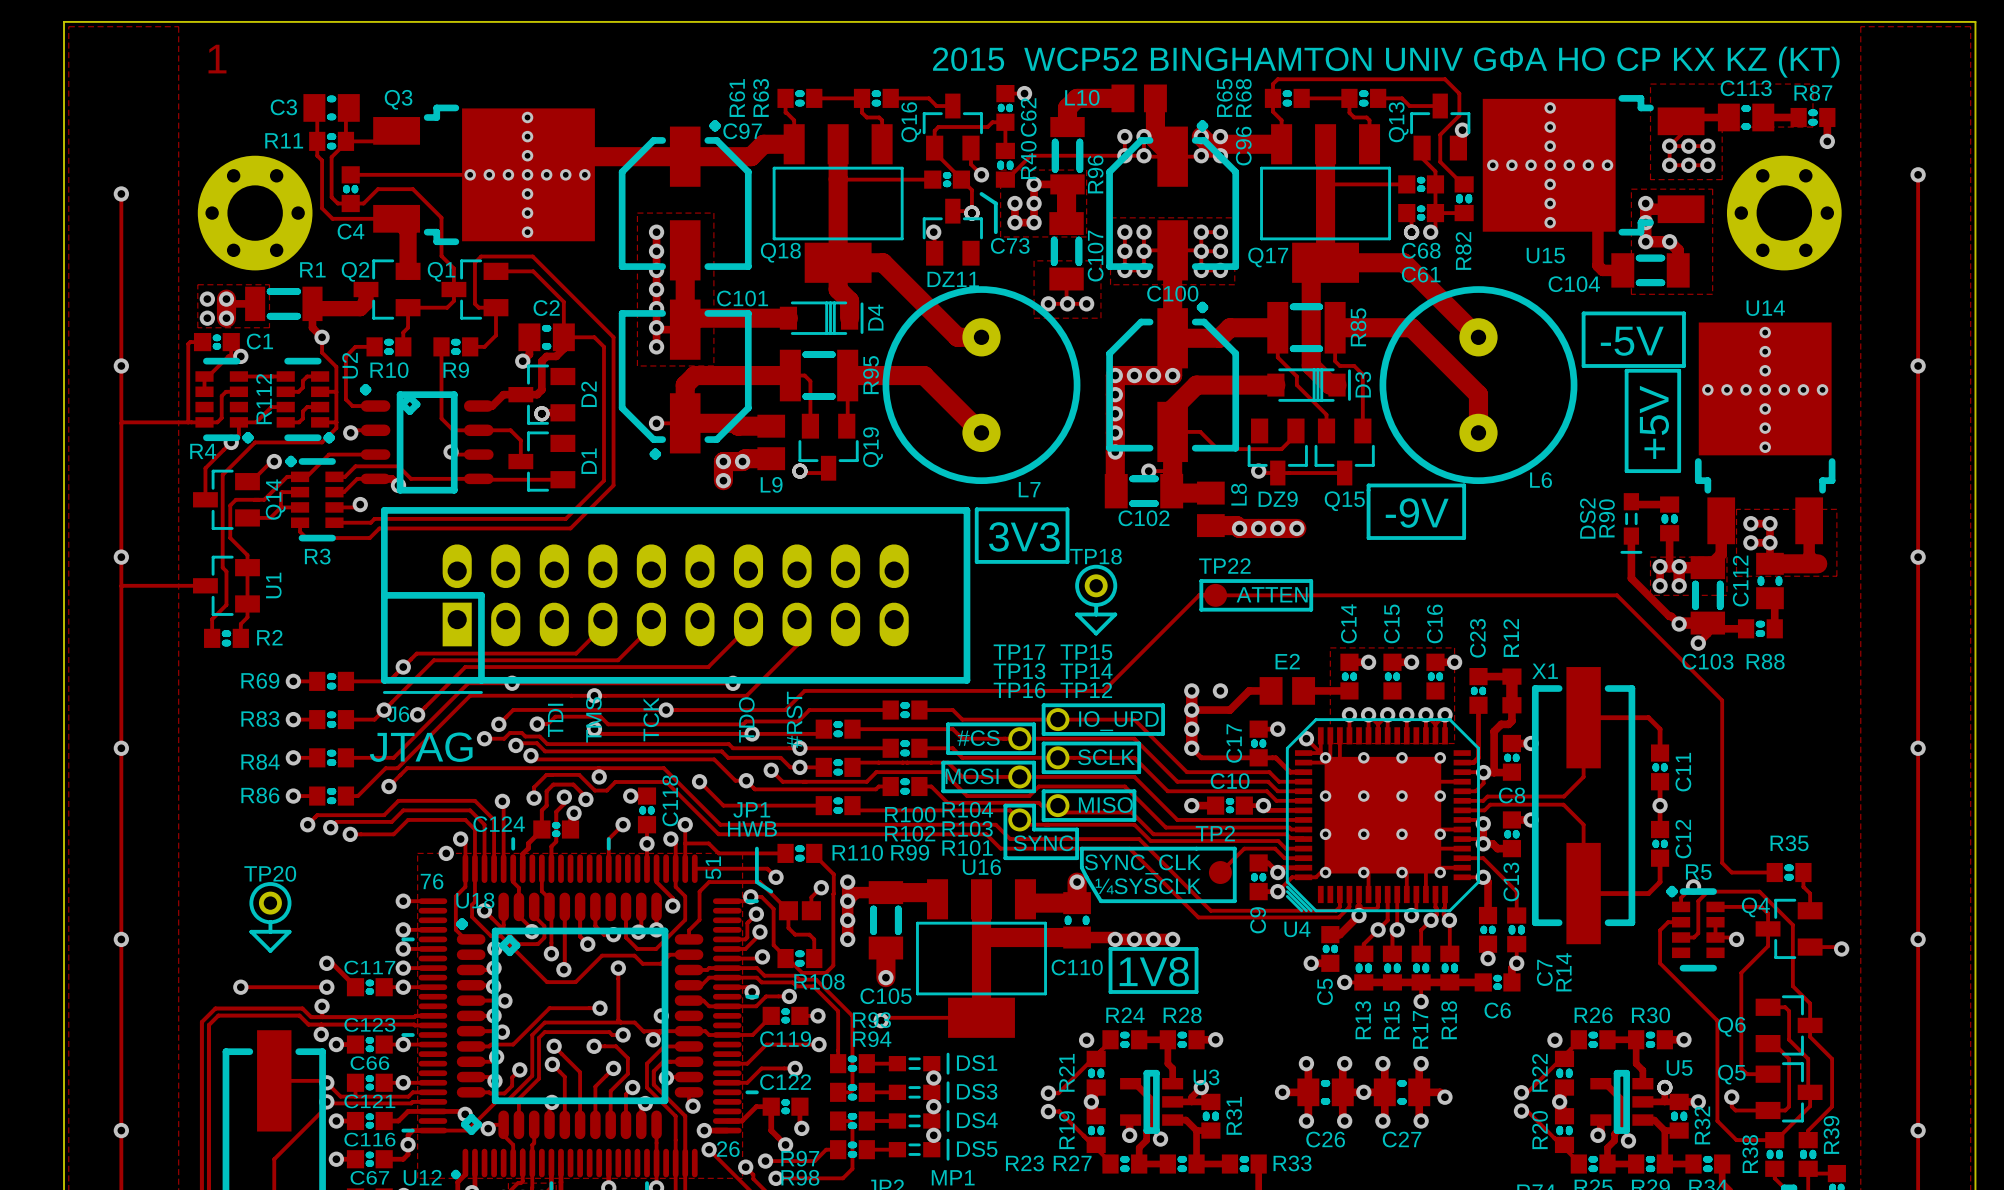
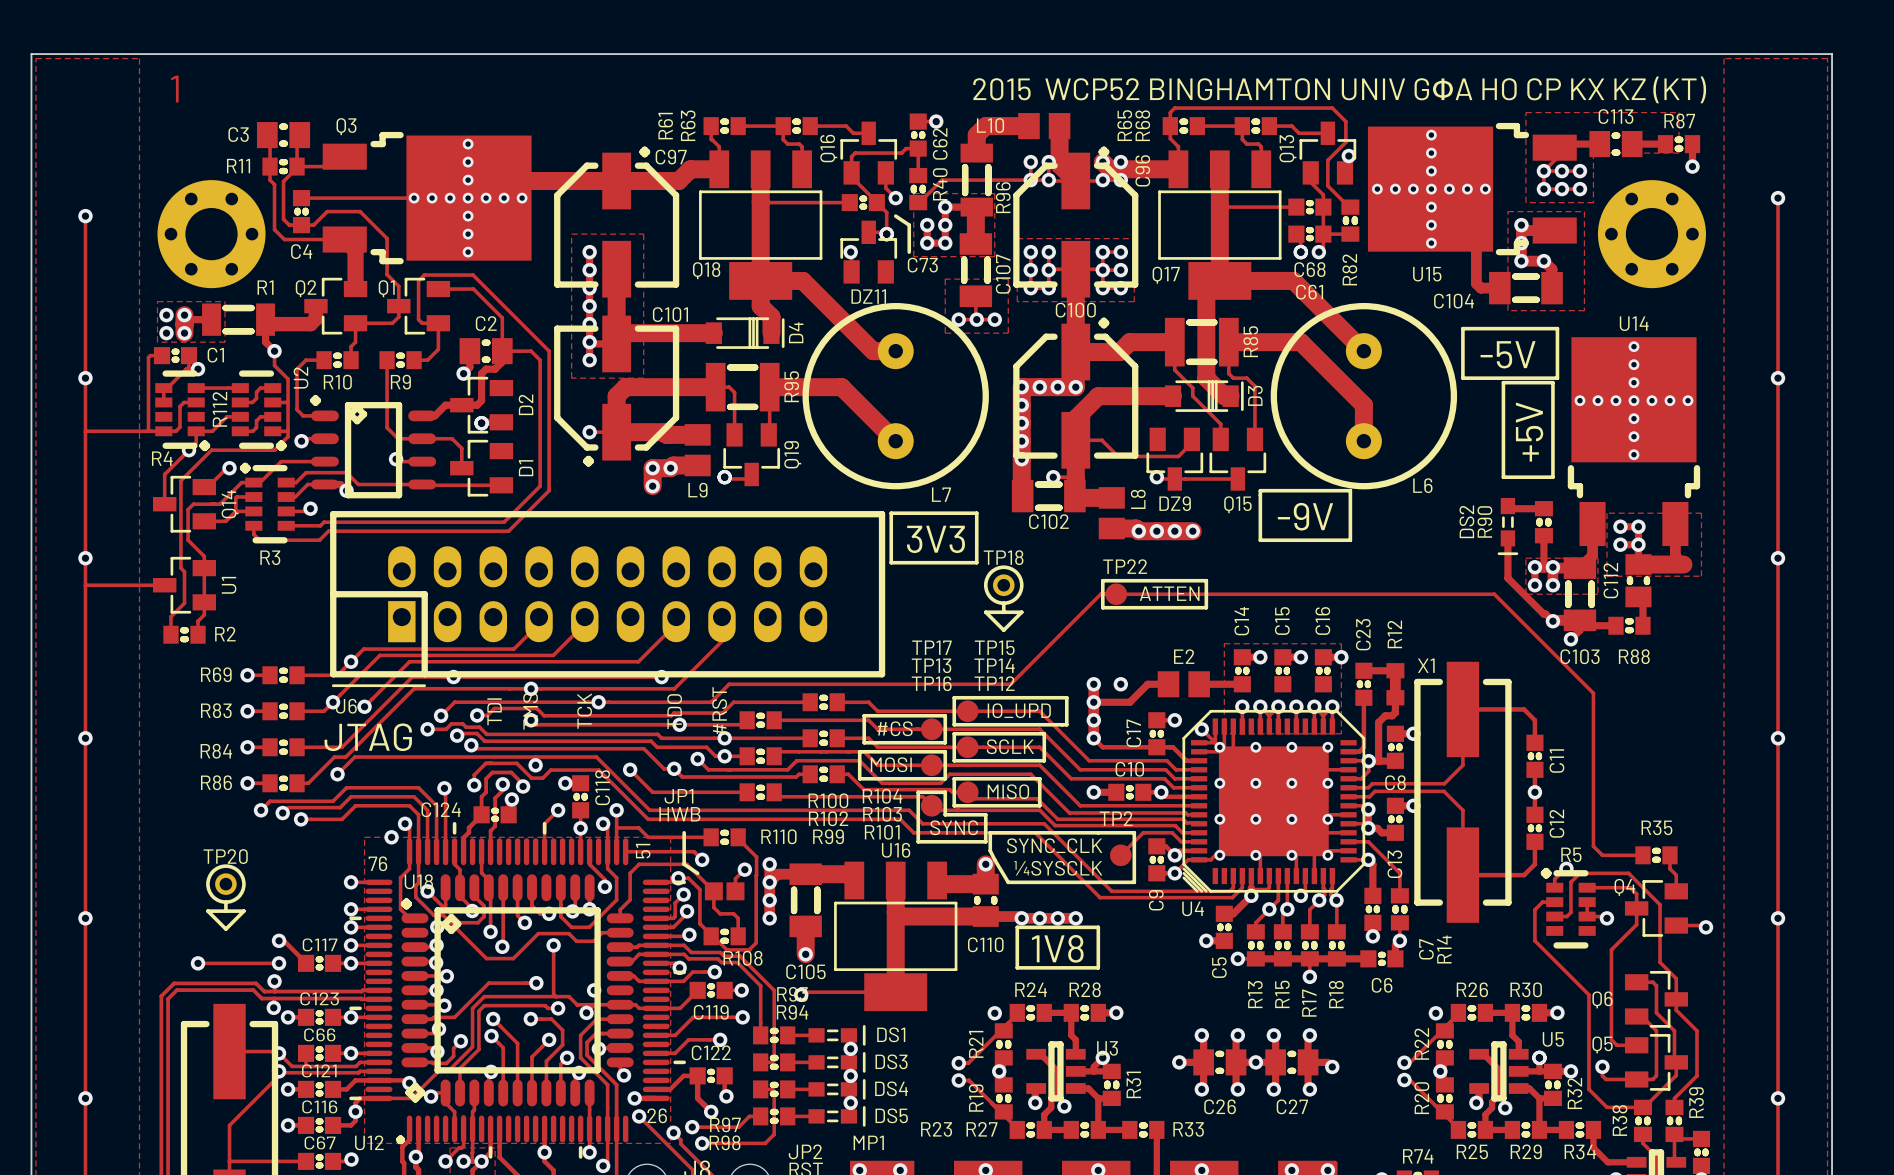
TP15 footprint: [1046, 708, 1070, 732] -> [956, 700, 979, 723]
TP17 footprint: [1008, 727, 1032, 751] -> [920, 718, 943, 741]
TP14 footprint: [1046, 746, 1070, 770] -> [956, 736, 979, 759]
TP13 footprint: [1008, 765, 1032, 789] -> [920, 754, 943, 777]
TP12 footprint: [1046, 794, 1070, 818] -> [956, 781, 979, 804]
TP16 footprint: [1008, 808, 1032, 832] -> [920, 794, 943, 817]

